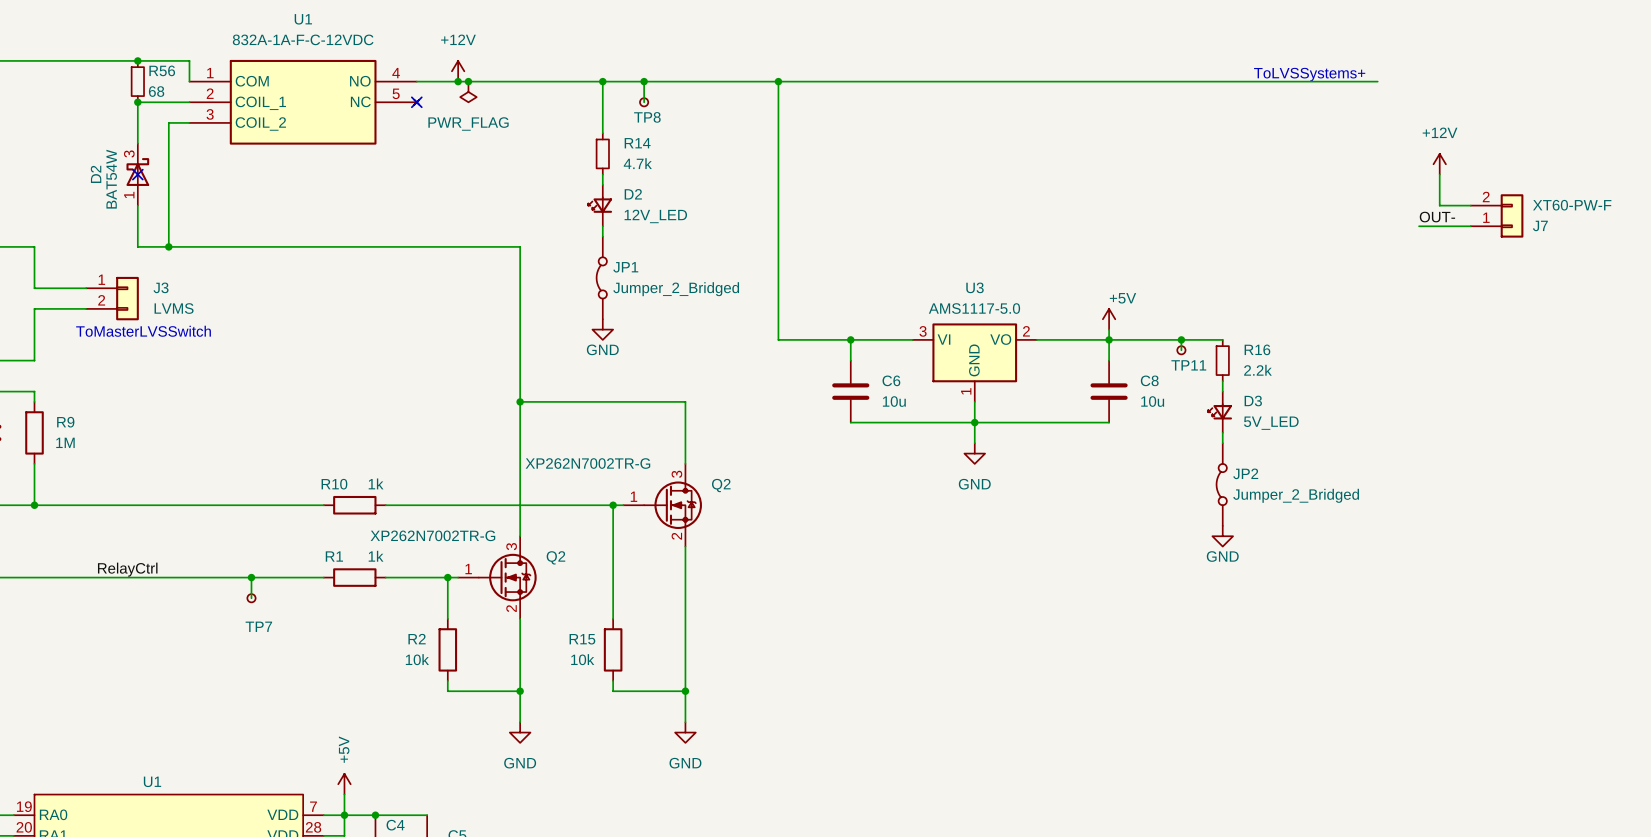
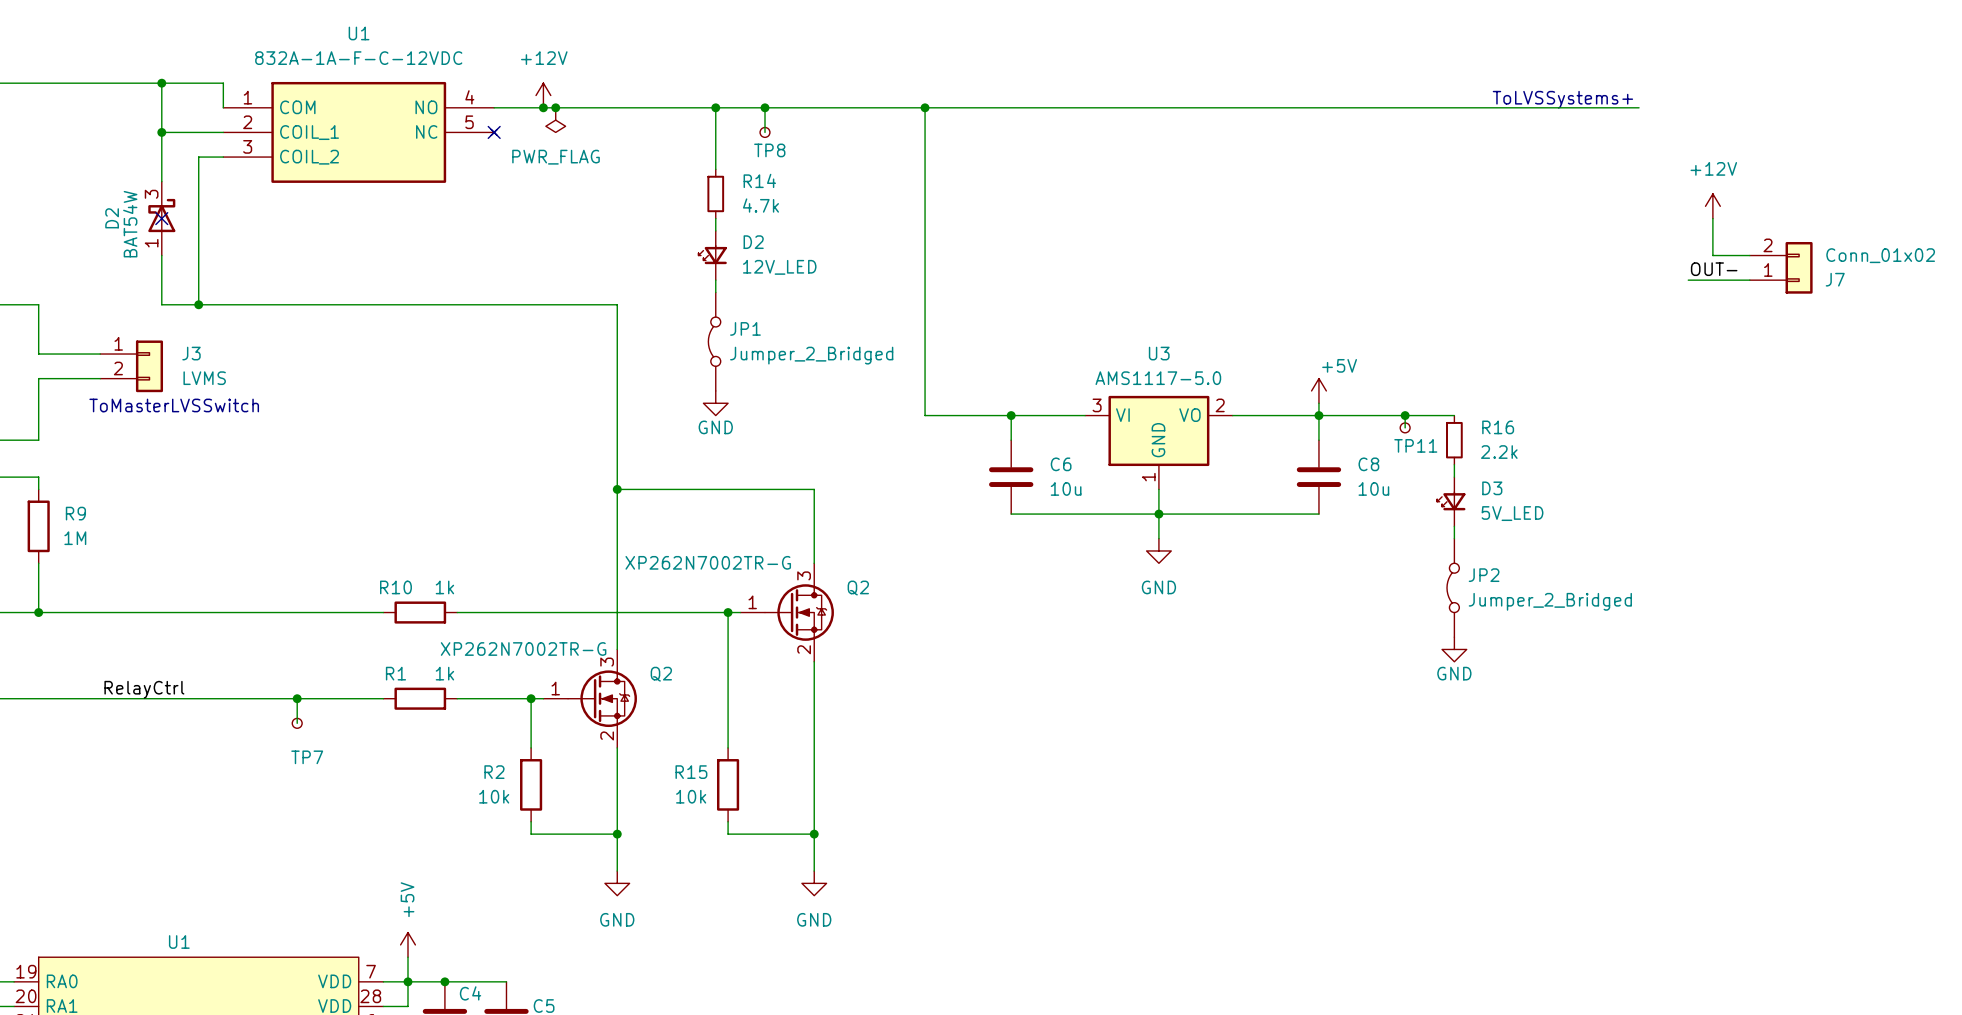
wire: none -> (161, 83) (161, 132)
R56: 68 (137, 81) -> none
J7 value: XT60-PW-F (1572, 205) -> Conn_01x02 (1880, 255)

